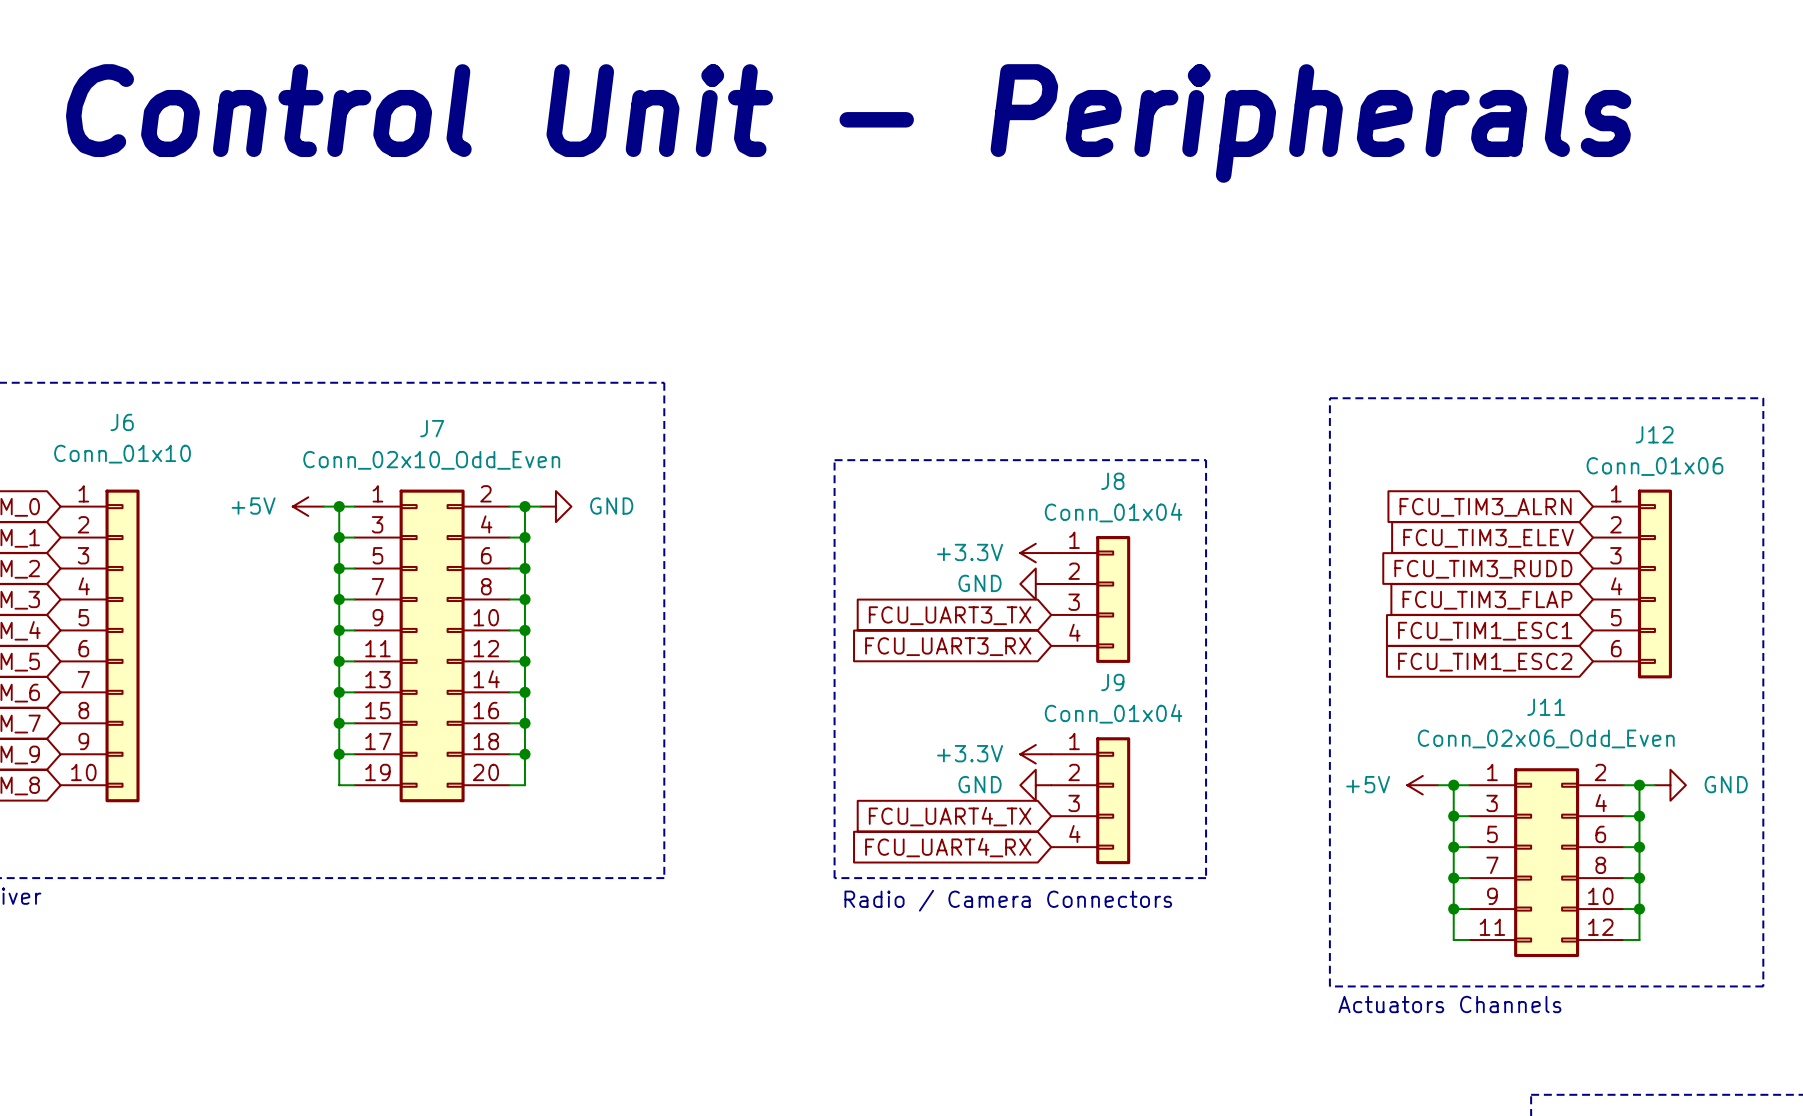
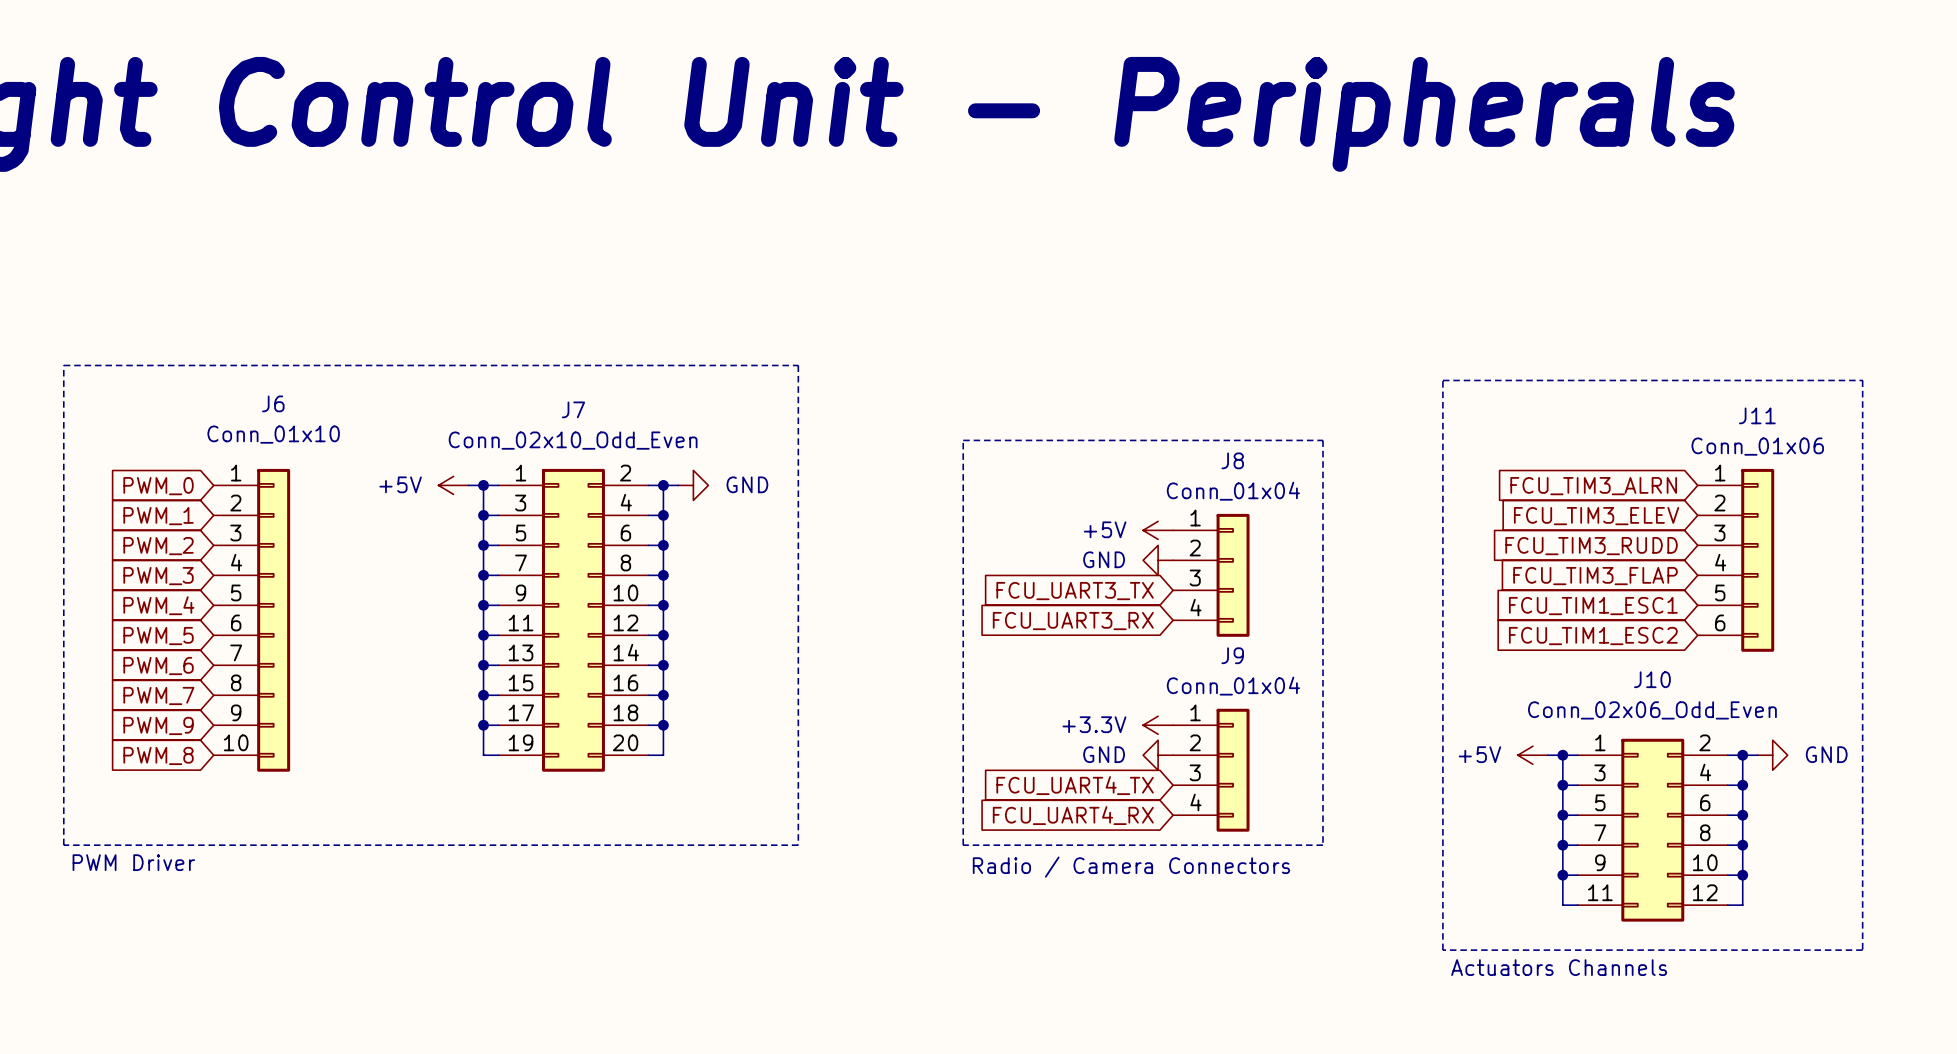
J12 name: J12 (1654, 434) -> J11 (1757, 415)
power symbol: +3.3V (1035, 553) -> +5V (1158, 530)
J11 name: J11 (1546, 707) -> J10 (1652, 679)

